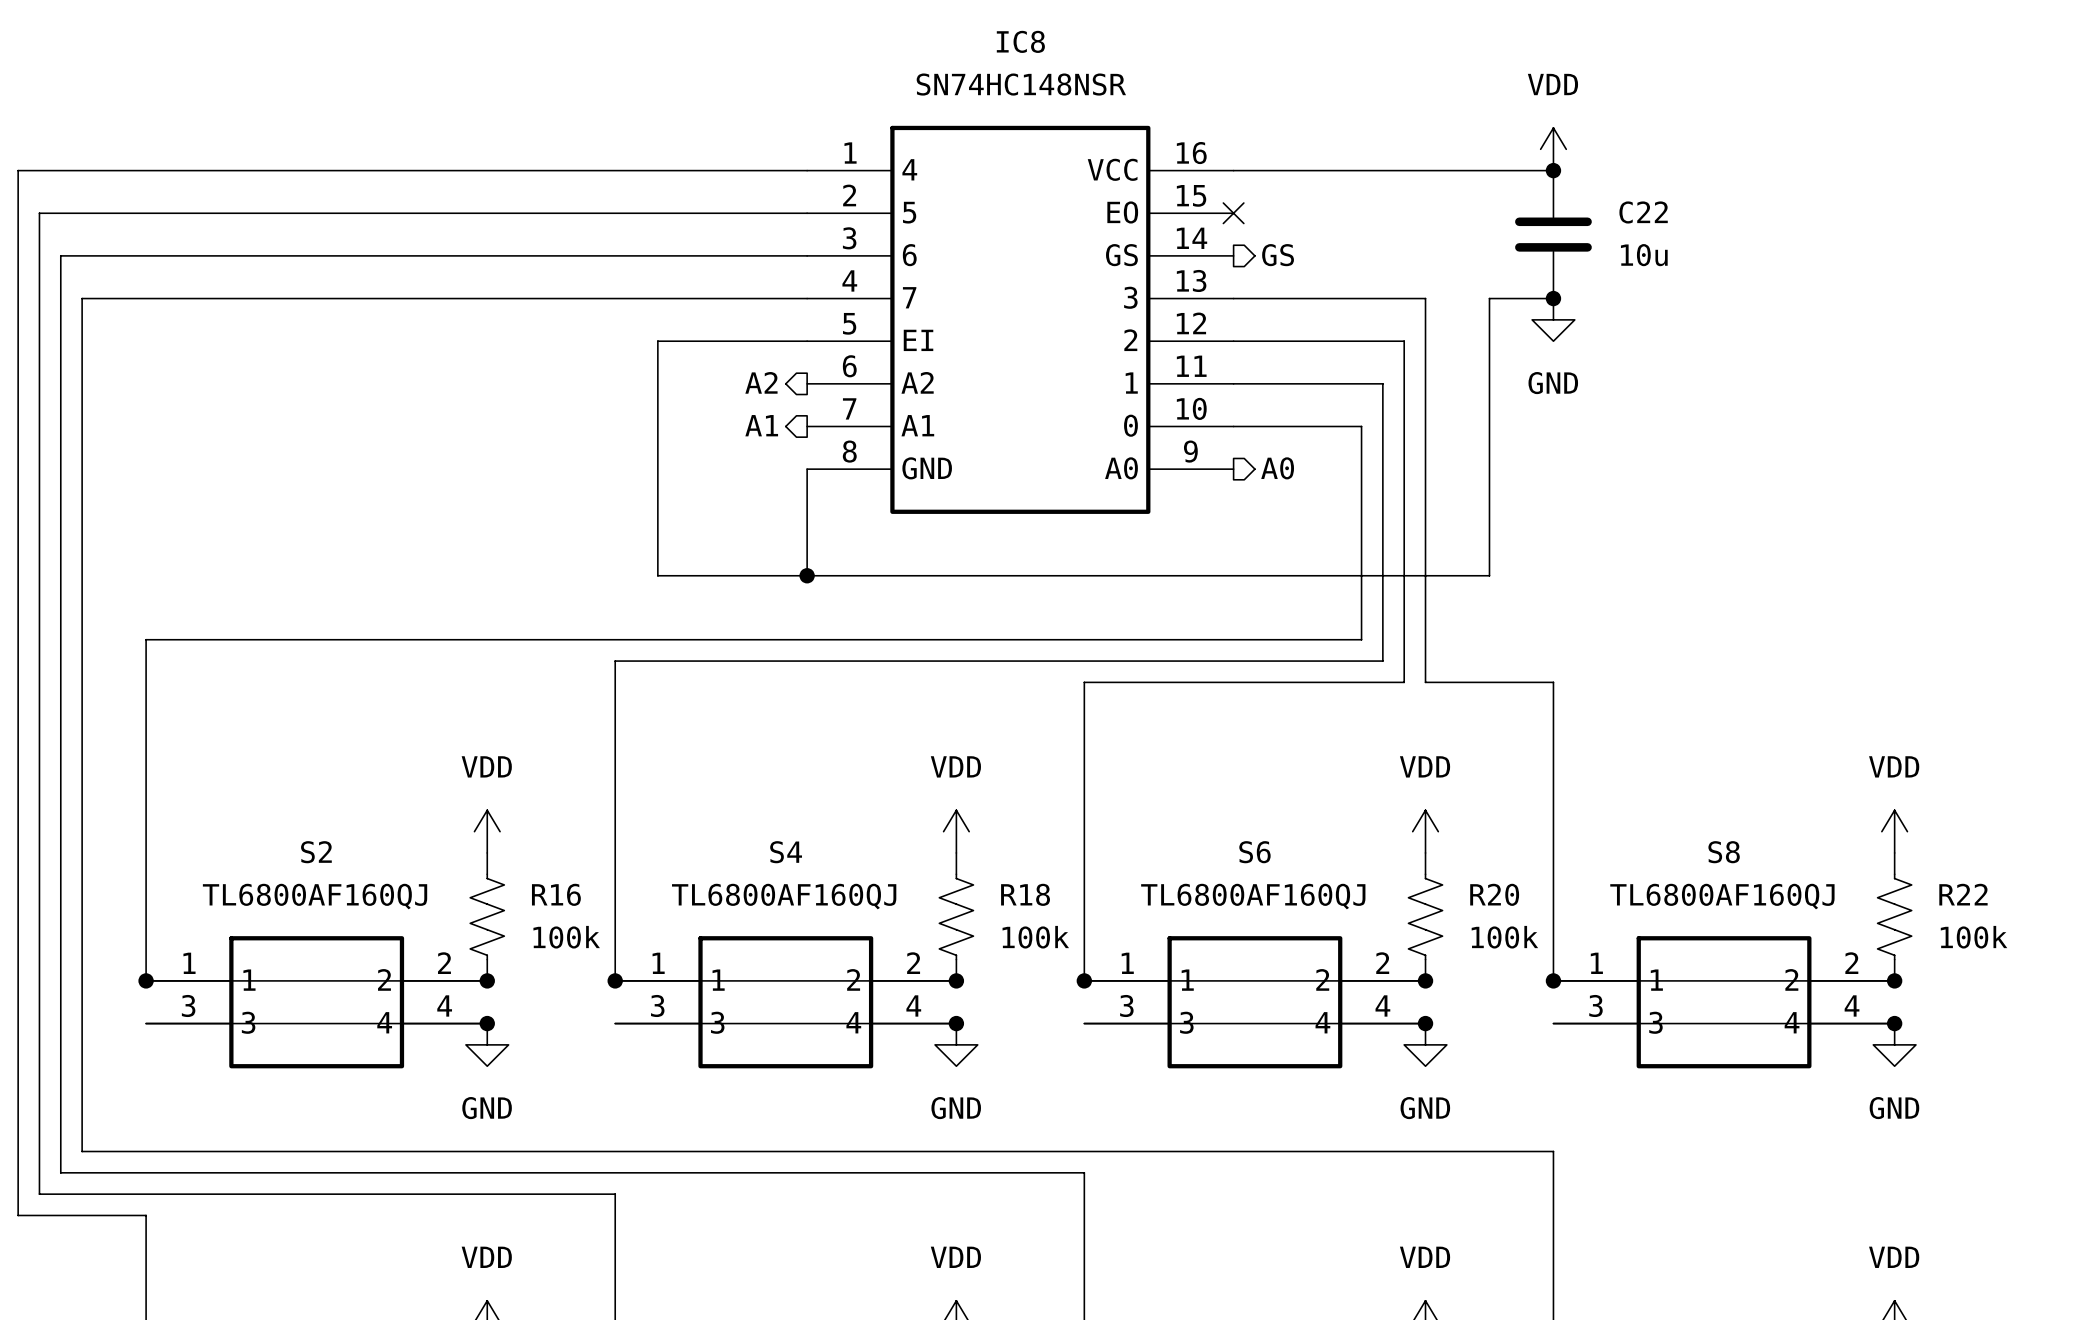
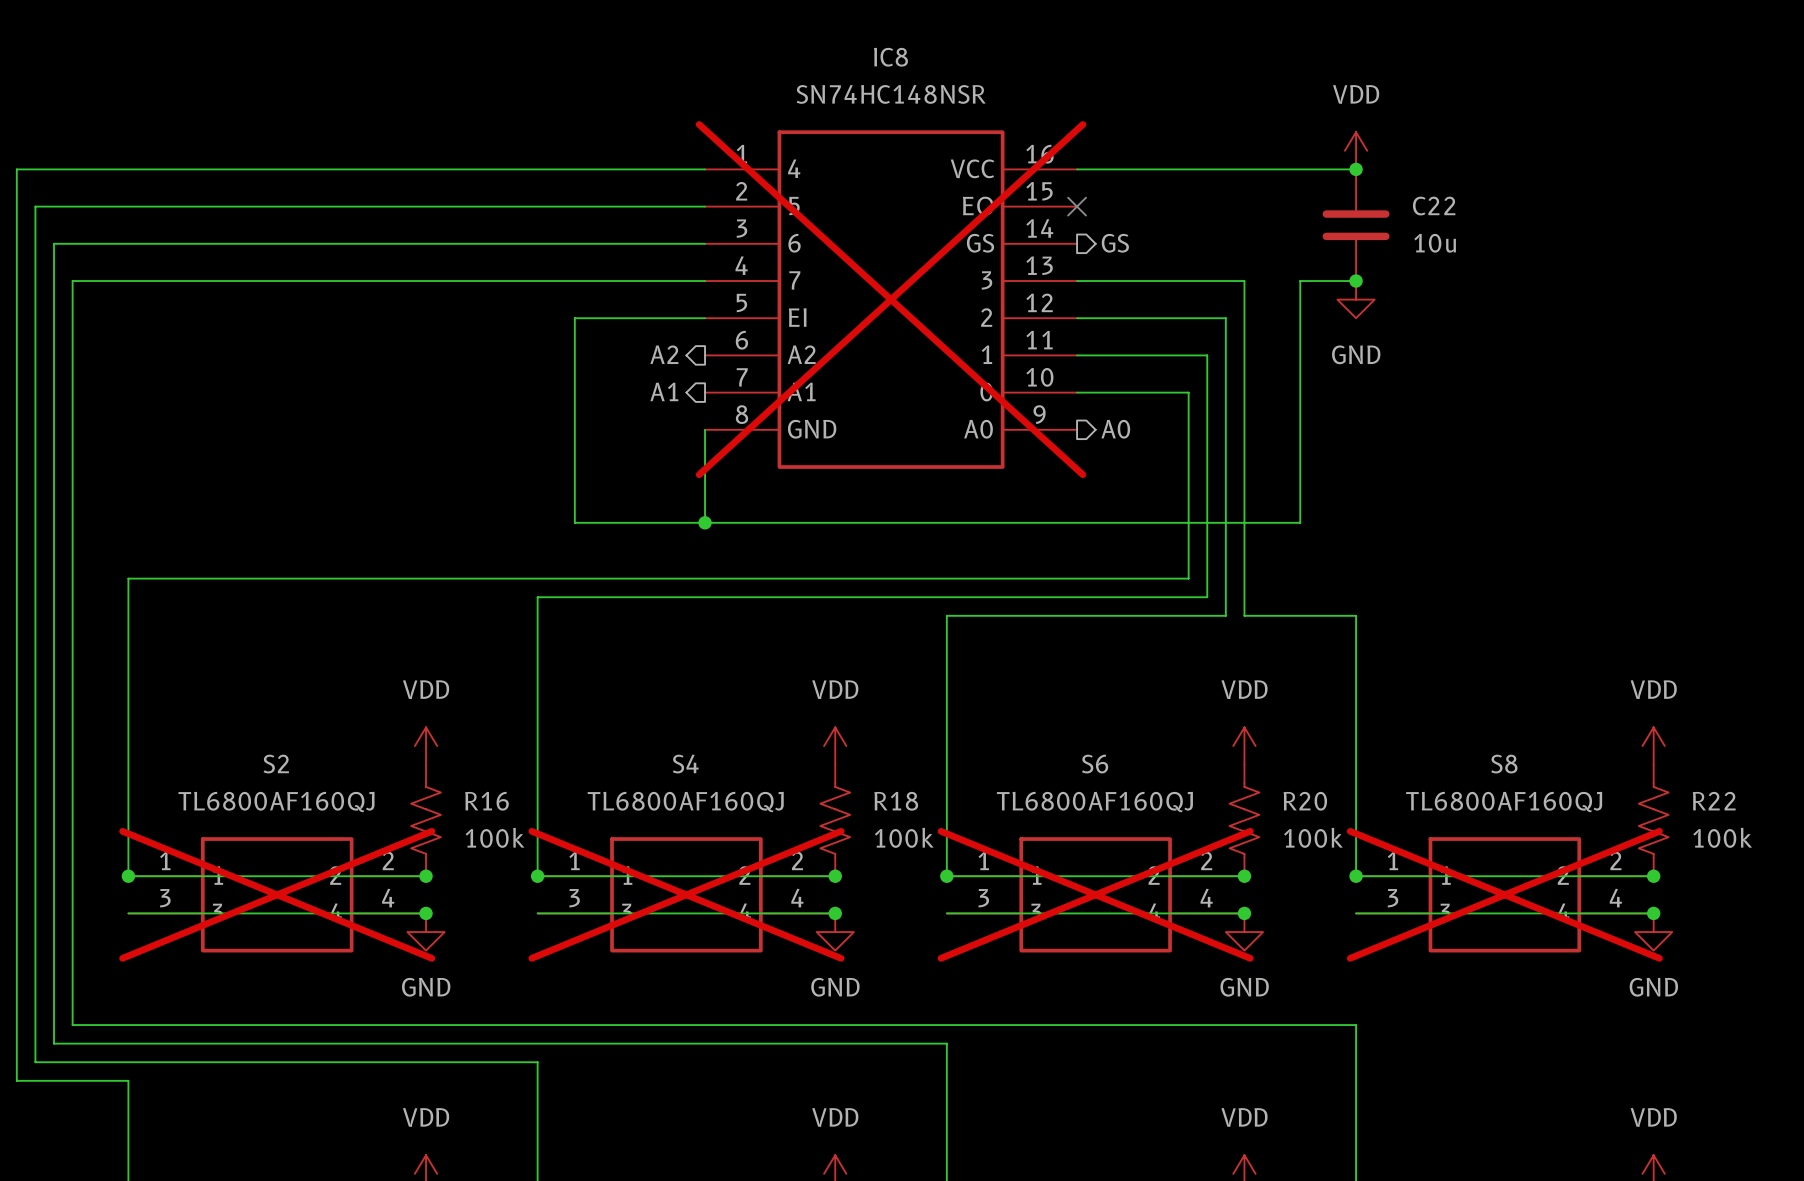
IC8 do-not-place cross: none -> (891, 299)
S2 do-not-place cross: none -> (277, 894)
S4 do-not-place cross: none -> (686, 894)
S6 do-not-place cross: none -> (1095, 894)
S8 do-not-place cross: none -> (1504, 894)

